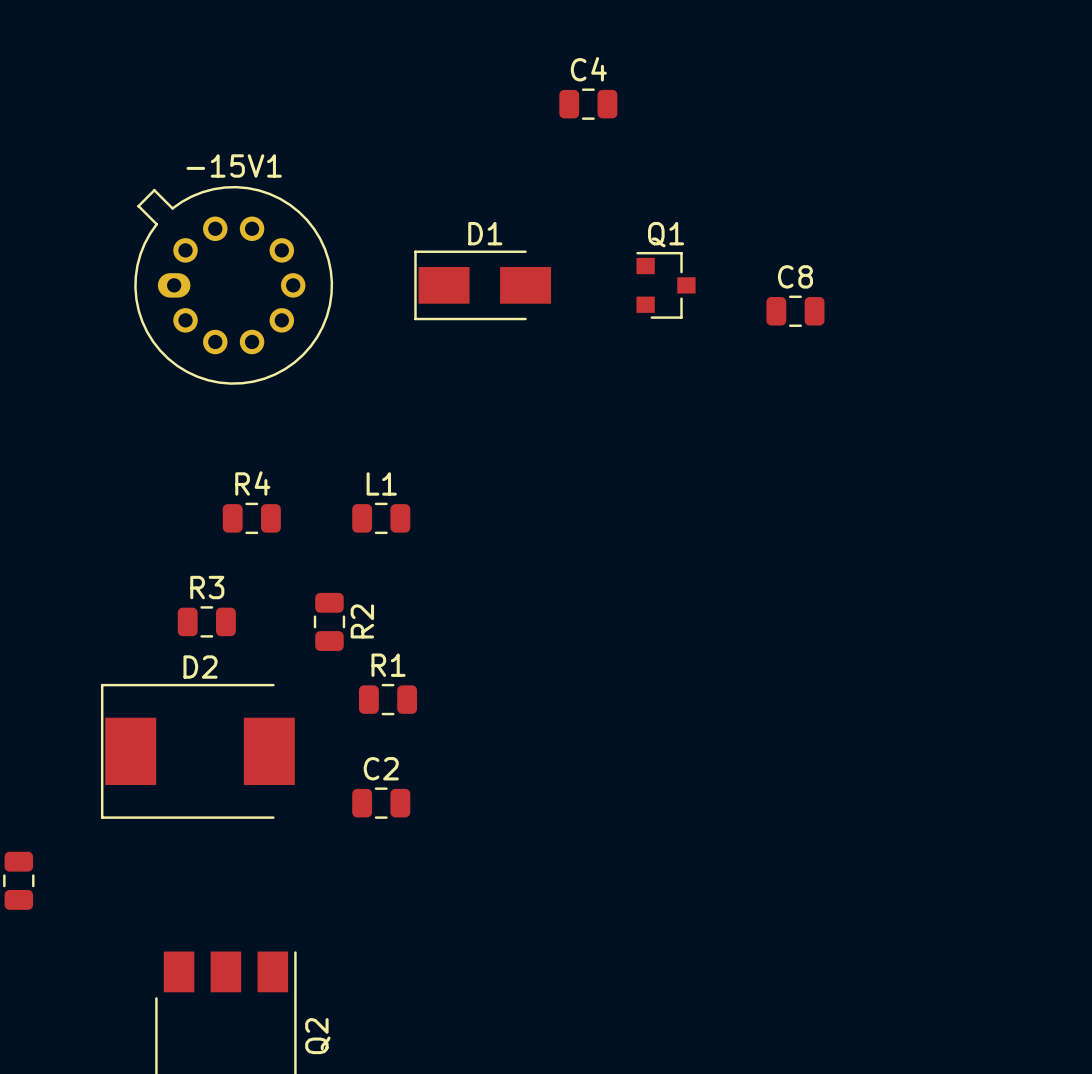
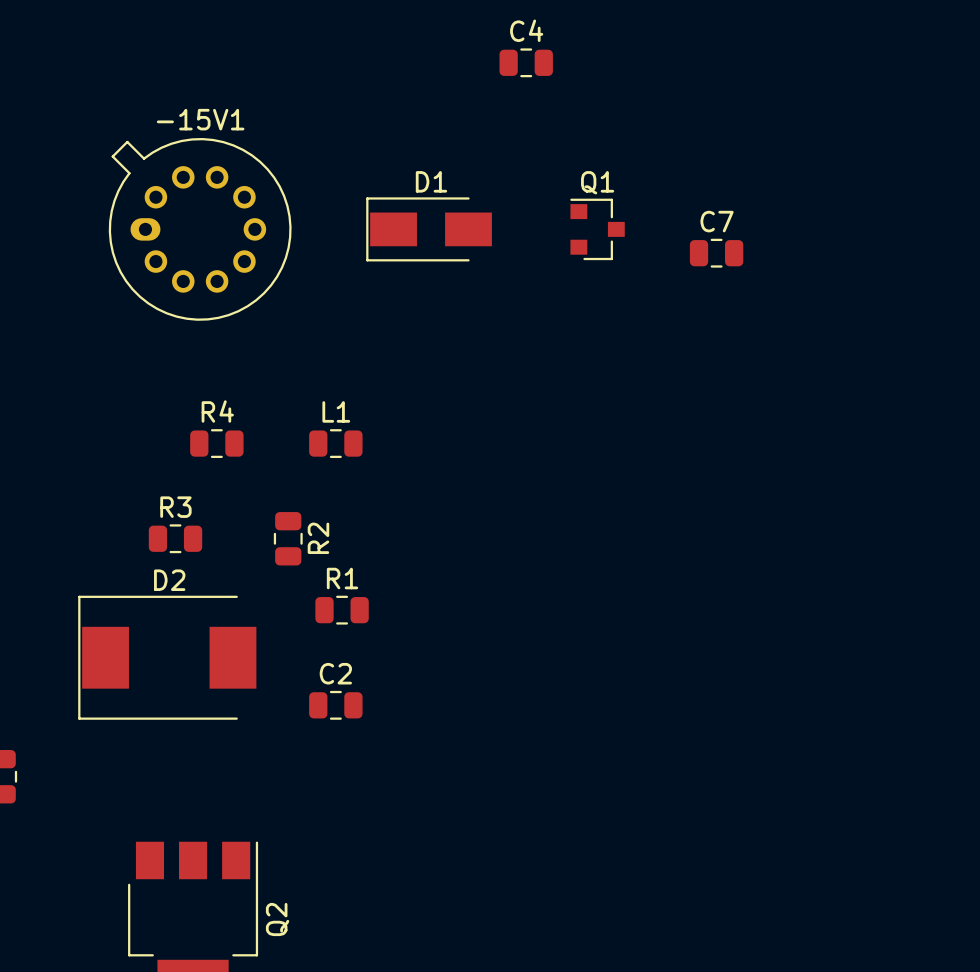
C8 name: C8 (795, 276) -> C7 (717, 221)

